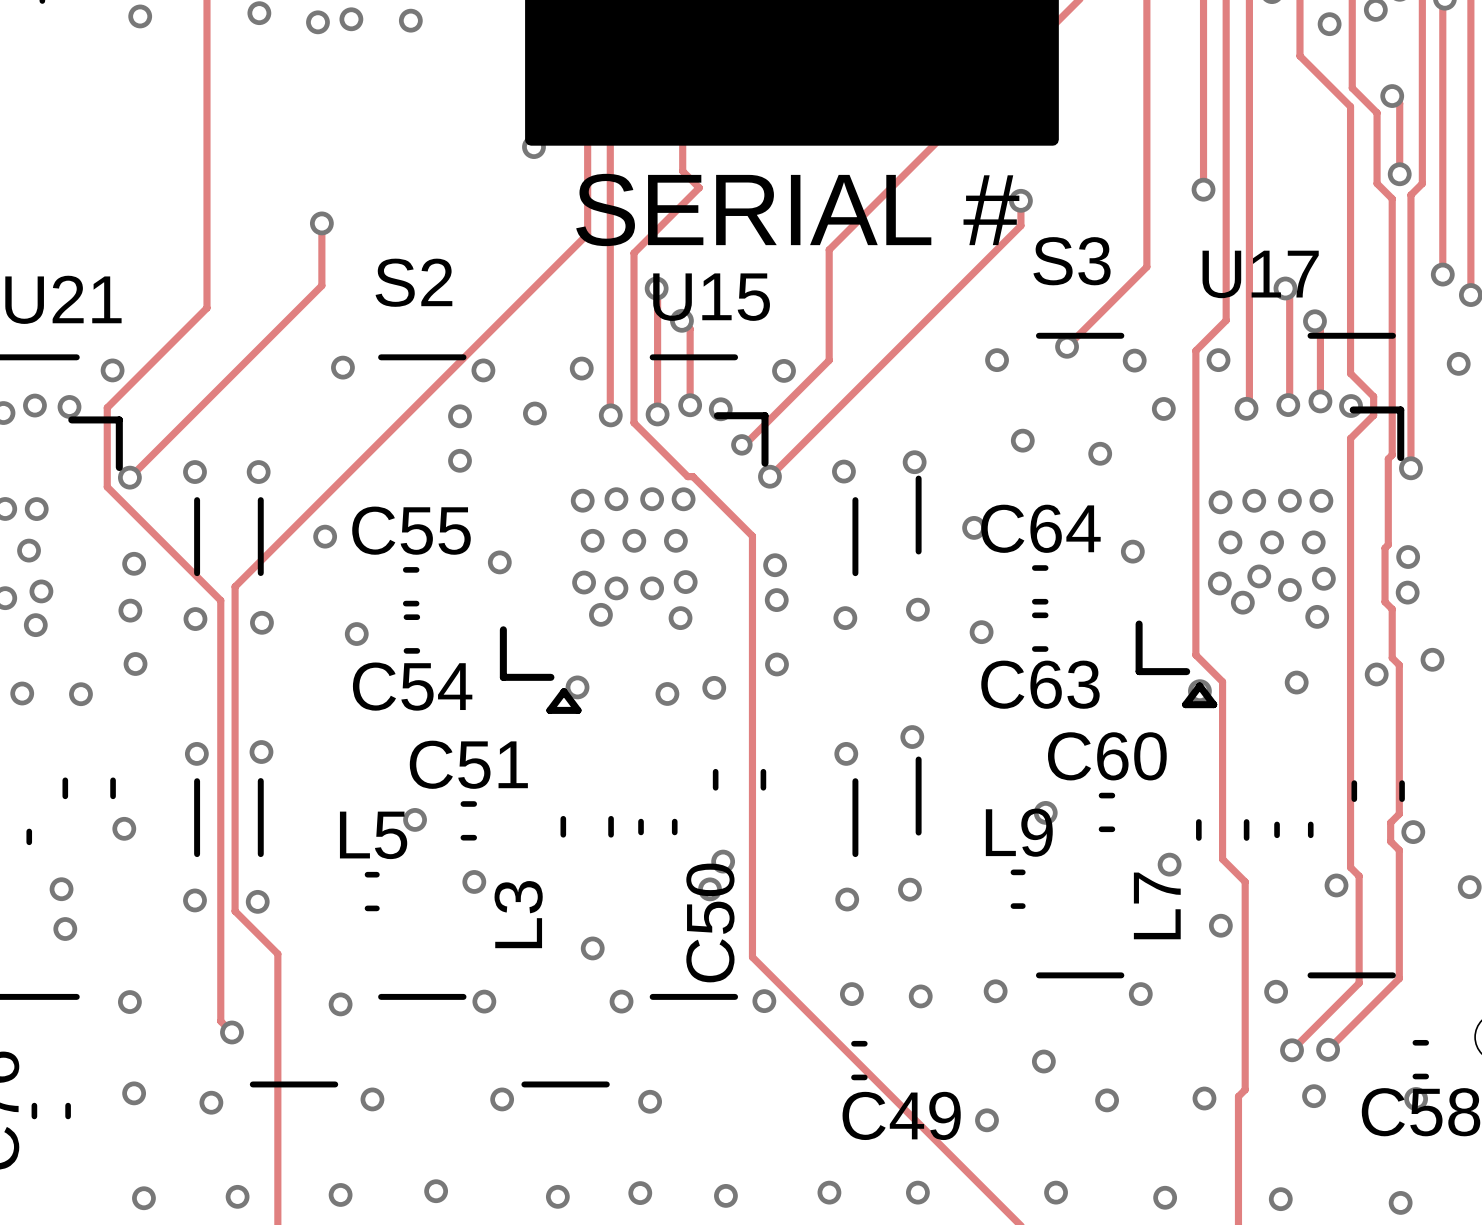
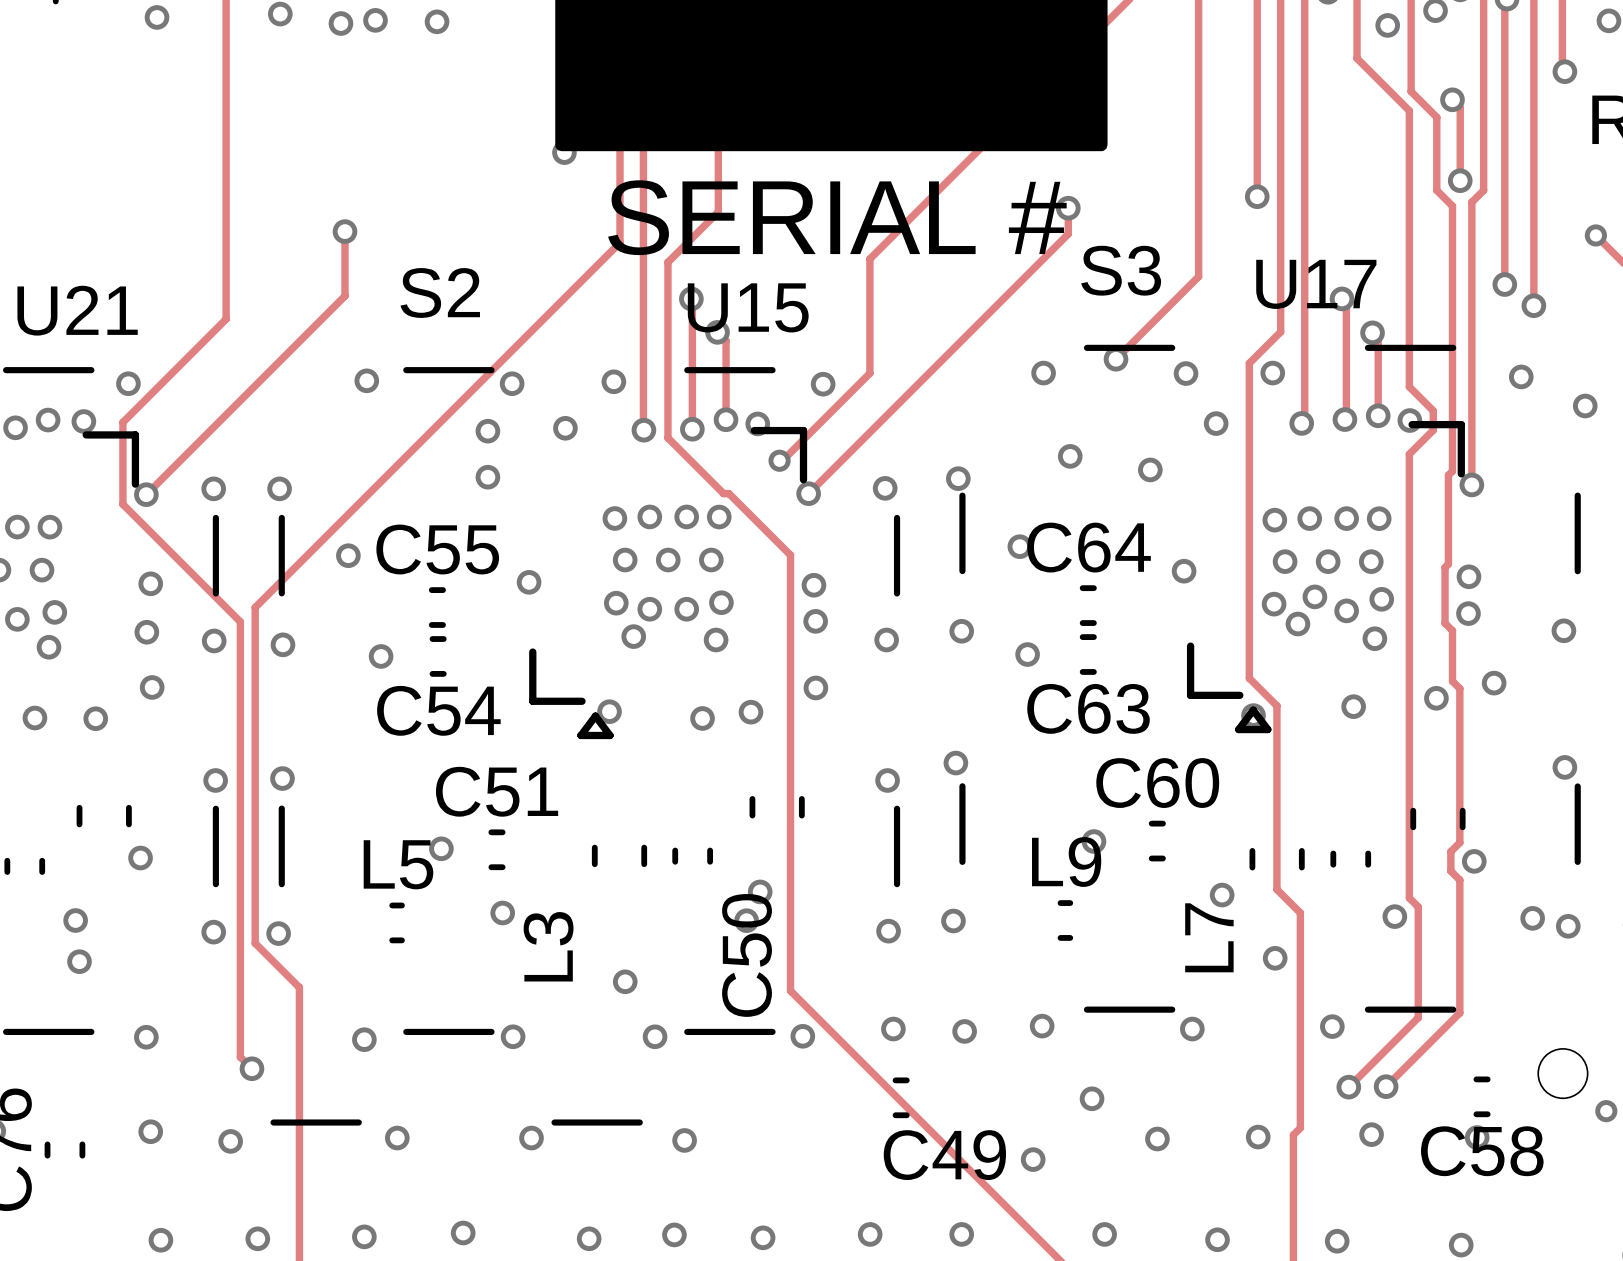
track: (682, 171) (699, 187) (682, 204) -> (718, 177) (718, 211)

